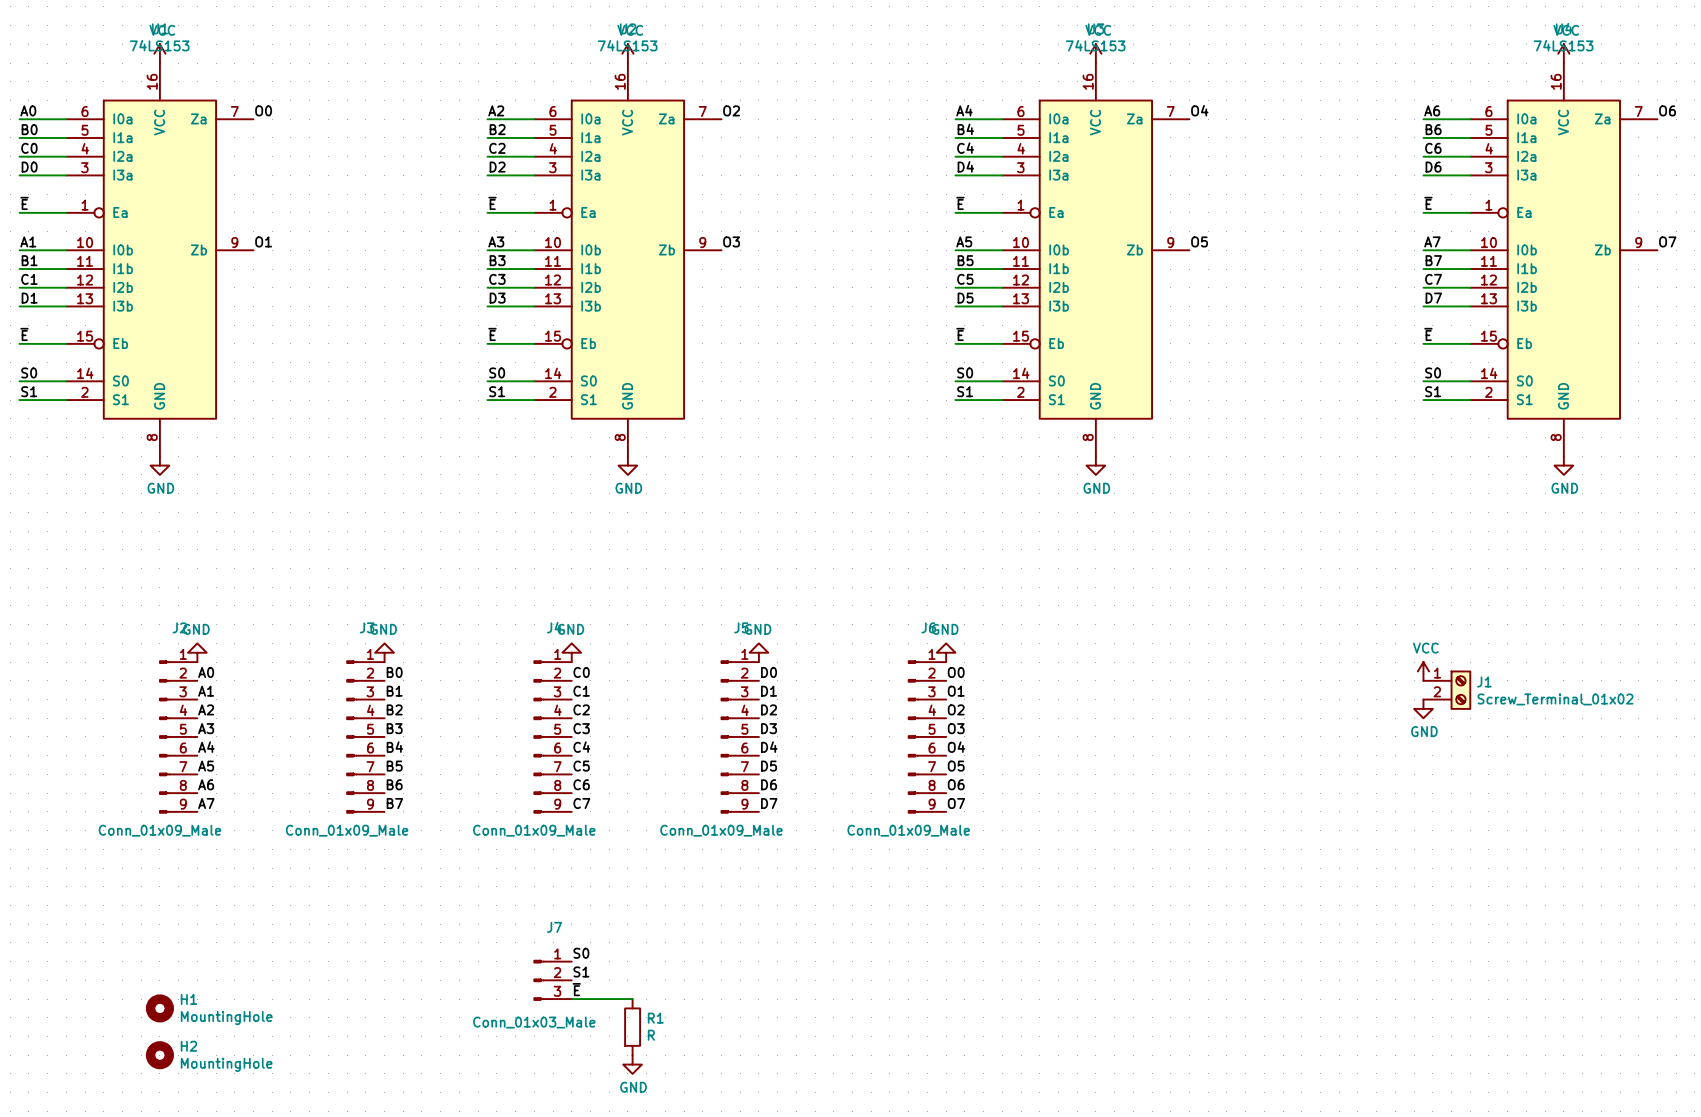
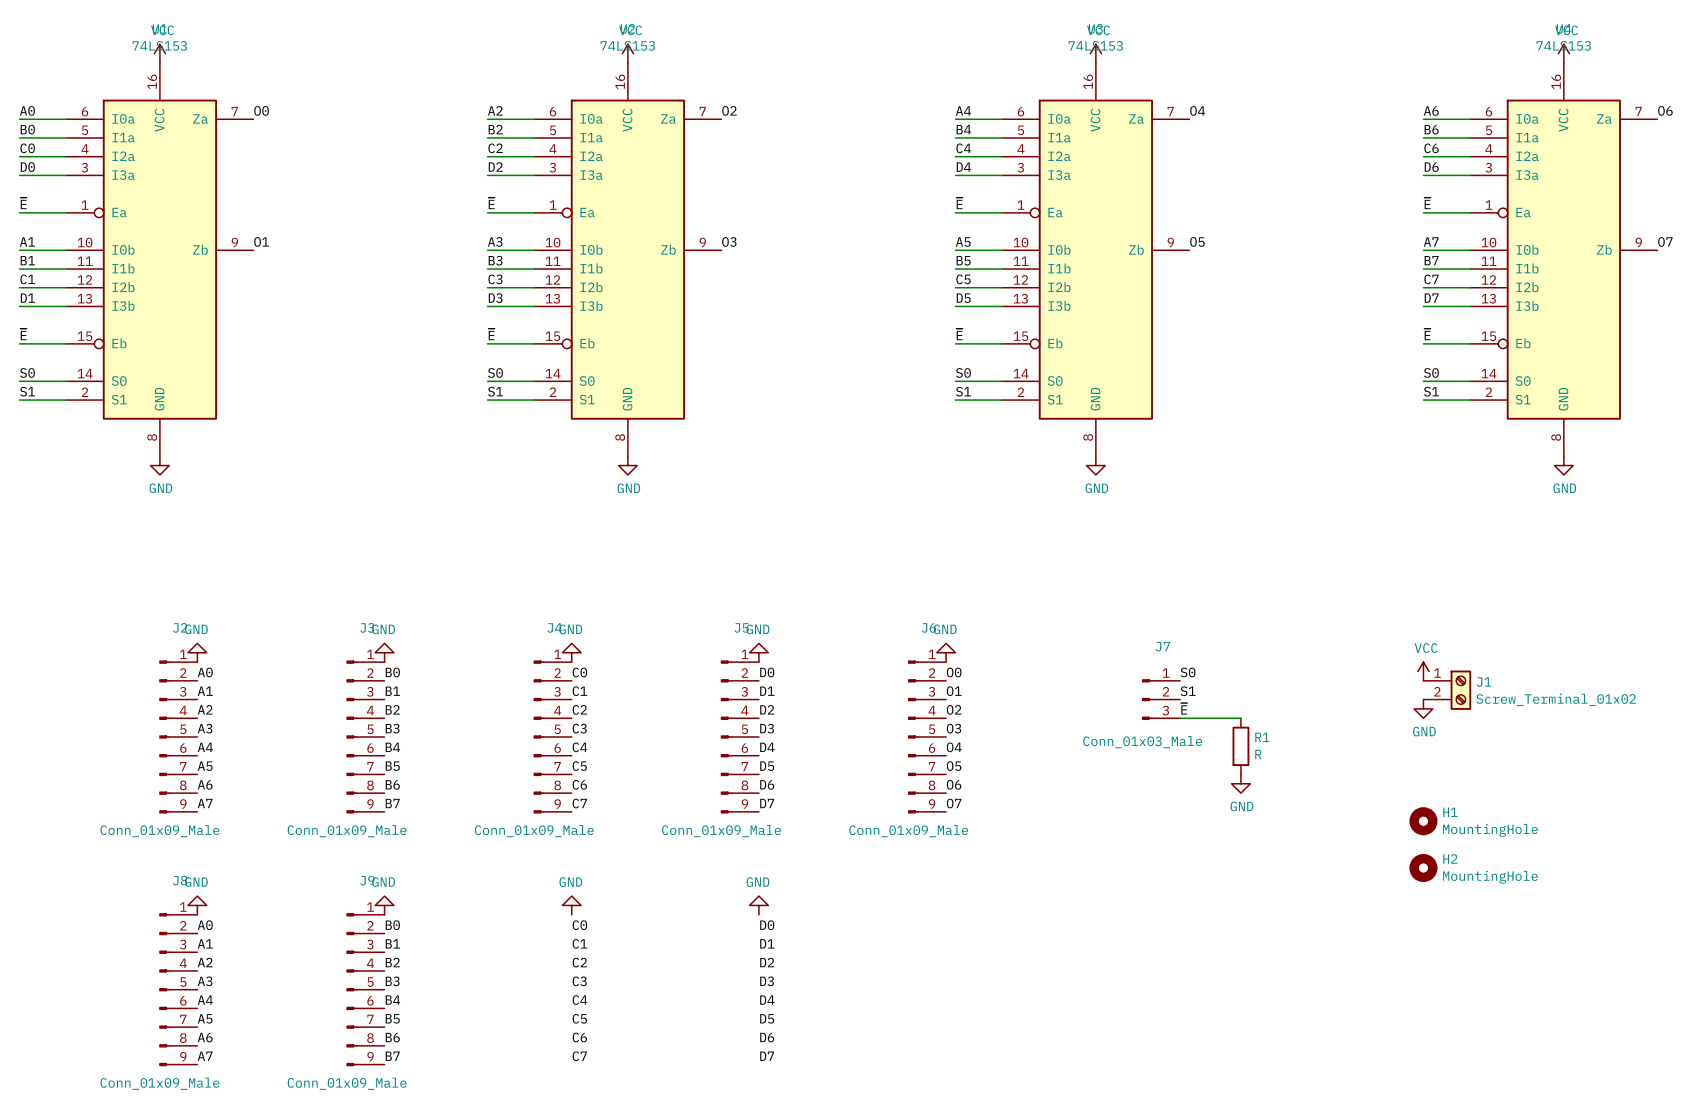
label: none -> S0 (1188, 672)
label: none -> S1 (1188, 691)
label: none -> ~{E} (1184, 708)
wire: none -> (1180, 718) (1240, 718)
power symbol: none -> GND (1240, 783)
power symbol: none -> GND (197, 905)
power symbol: none -> GND (384, 905)
power symbol: none -> GND (571, 905)
power symbol: none -> GND (758, 905)
label: none -> A0 (205, 925)
label: none -> B0 (392, 925)
label: none -> C0 (579, 925)
label: none -> D0 (767, 925)
label: none -> A1 (205, 943)
label: none -> B1 (392, 943)
label: none -> C1 (579, 943)
label: none -> D1 (767, 943)
label: S0 (581, 953) -> none
label: none -> A2 (205, 962)
label: none -> B2 (392, 962)
label: none -> C2 (579, 962)
label: none -> D2 (767, 962)
label: S1 (581, 971) -> none
J7 position: (552, 980) -> (1161, 699)
label: none -> A3 (205, 981)
label: none -> B3 (392, 981)
label: none -> C3 (579, 981)
label: none -> D3 (767, 981)
J8: none -> Conn_01x09_Male (178, 989)
J9: none -> Conn_01x09_Male (365, 989)
label: ~{E} (576, 989) -> none
label: none -> A4 (205, 1000)
label: none -> B4 (392, 1000)
wire: (571, 999) (632, 999) -> none
label: none -> C4 (580, 1000)
label: none -> D4 (767, 1000)
H1 position: (159, 1008) -> (1423, 821)
label: none -> A5 (205, 1018)
label: none -> B5 (392, 1018)
label: none -> C5 (579, 1018)
label: none -> D5 (767, 1018)
R1 position: (632, 1027) -> (1240, 746)
label: none -> A6 (205, 1037)
label: none -> B6 (392, 1037)
label: none -> C6 (579, 1037)
label: none -> D6 (767, 1037)
H2 position: (159, 1055) -> (1423, 868)
label: none -> A7 (205, 1056)
label: none -> B7 (392, 1056)
label: none -> C7 (579, 1056)
label: none -> D7 (767, 1056)
power symbol: GND (632, 1064) -> none

